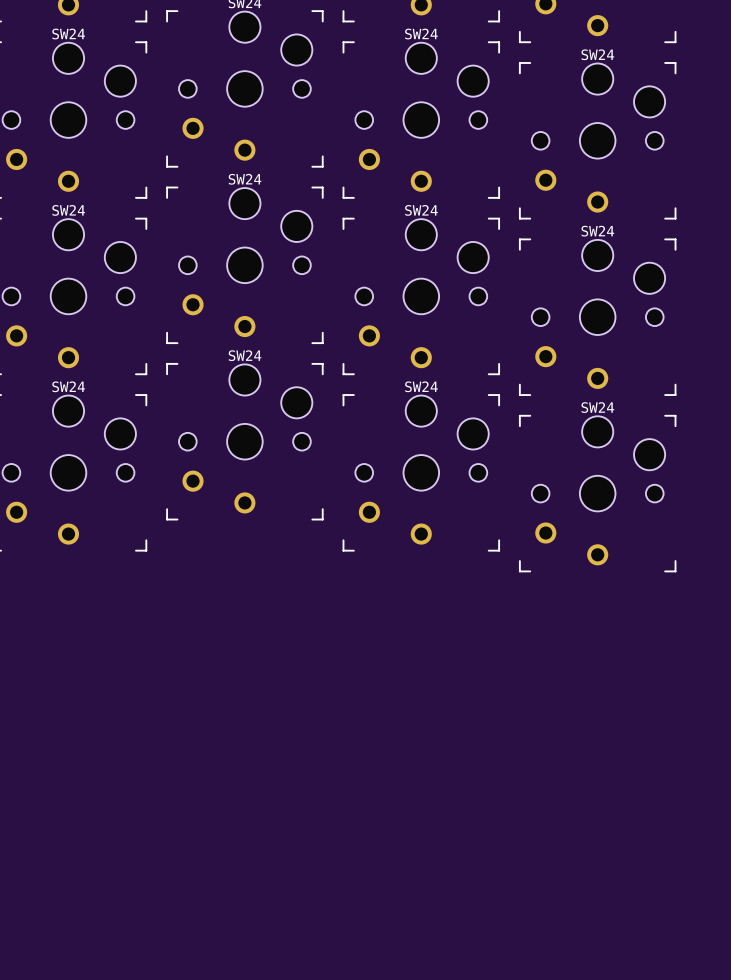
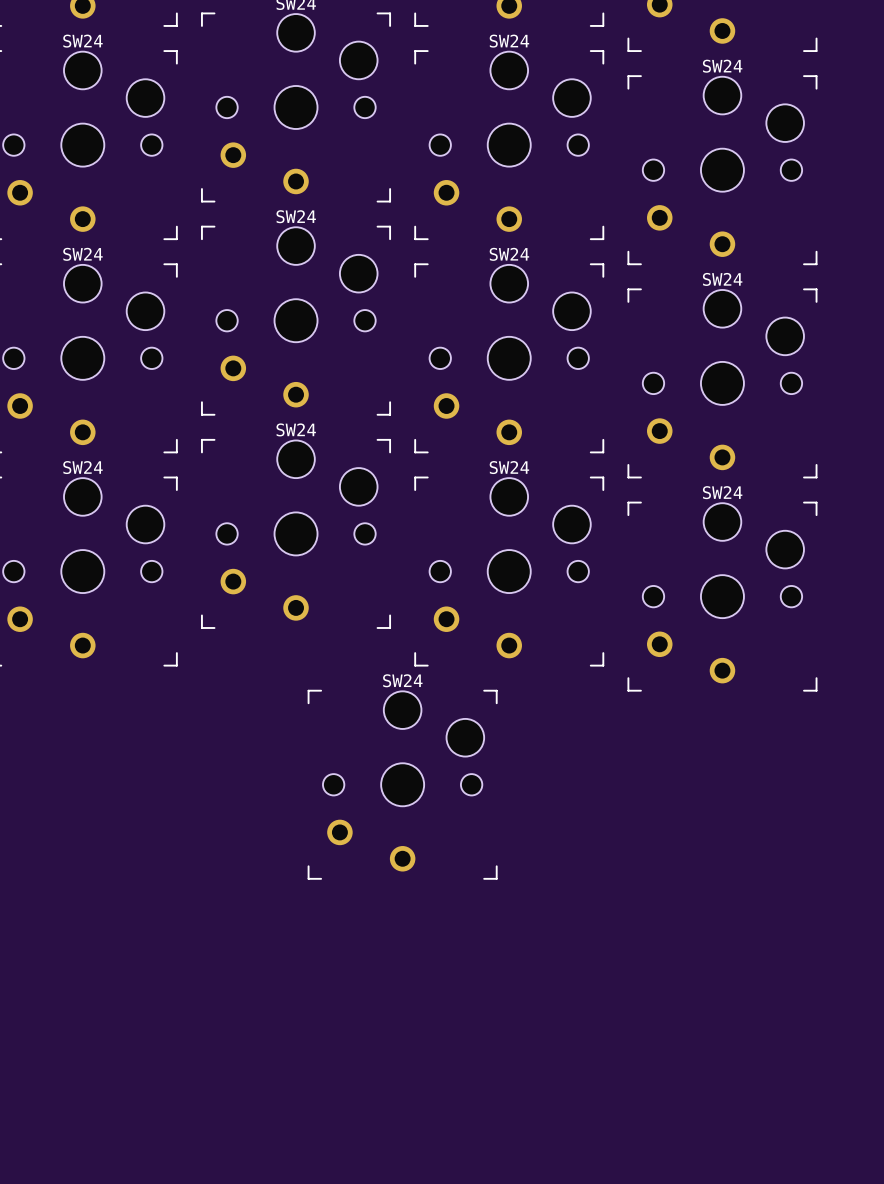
SW24: none -> (402, 784)

